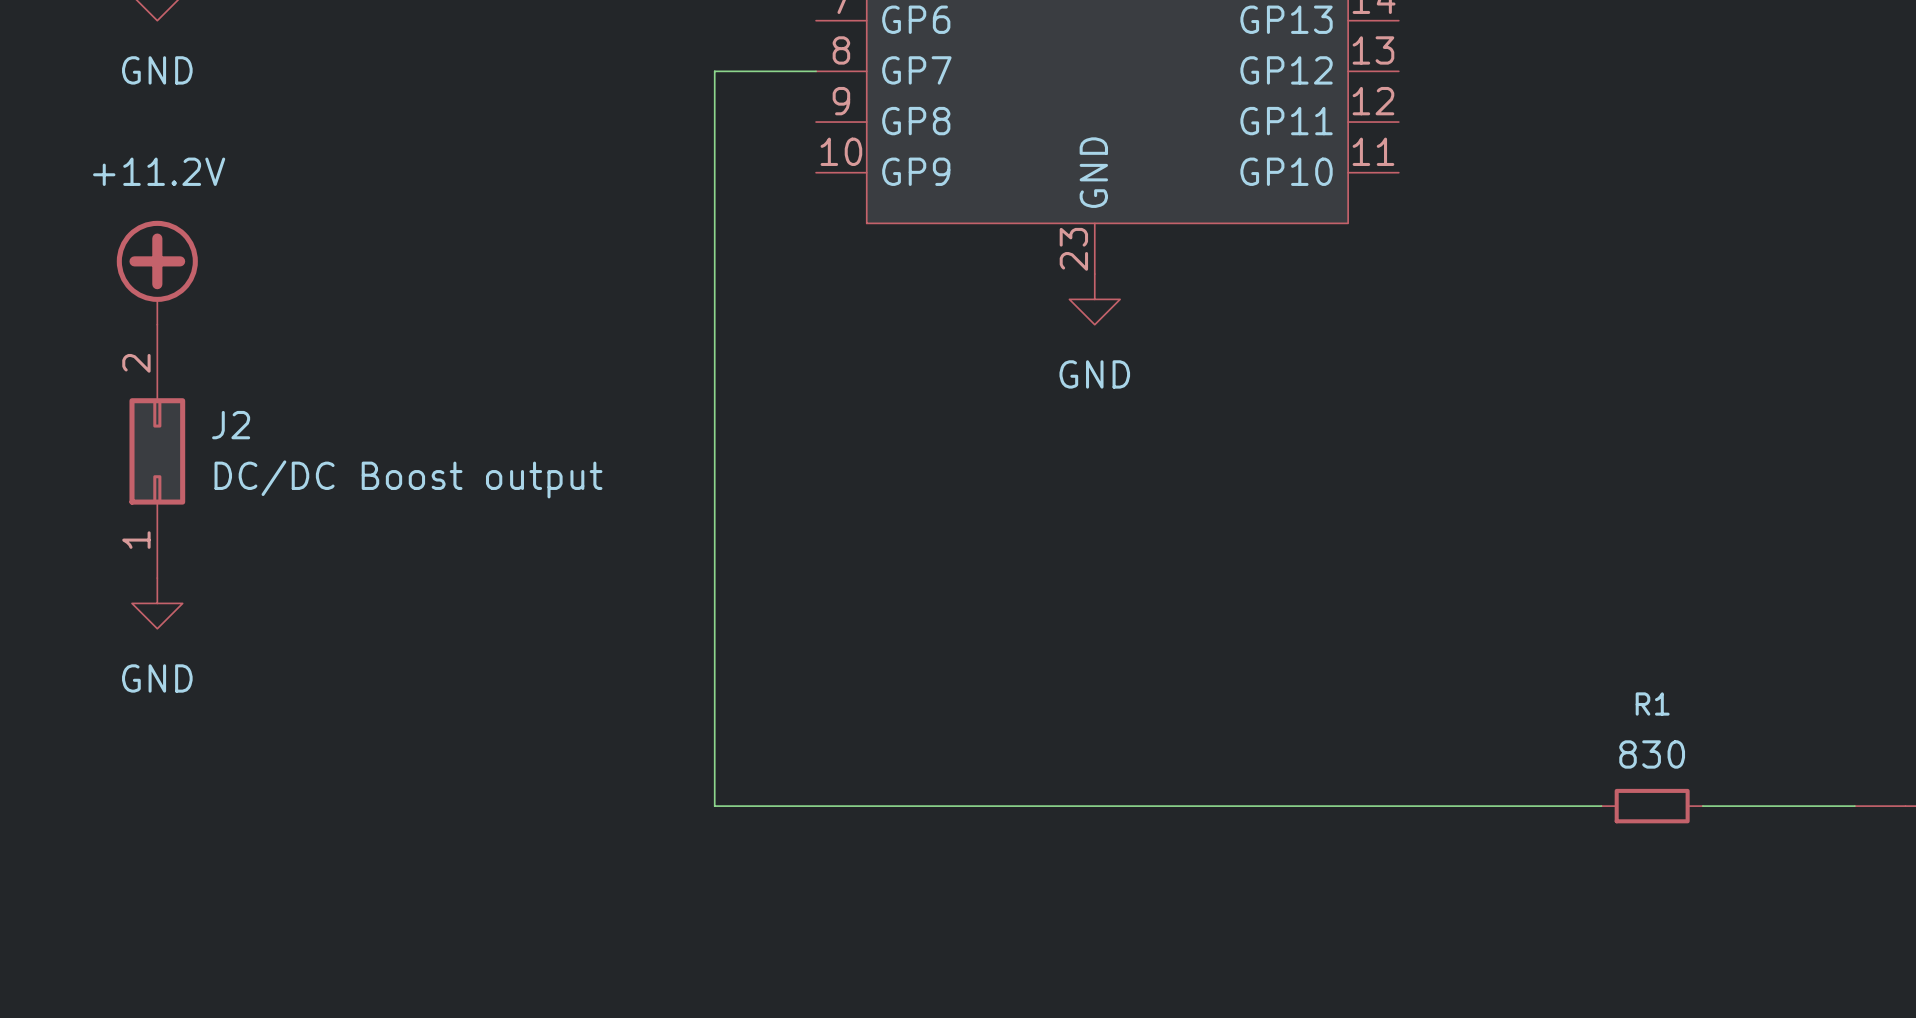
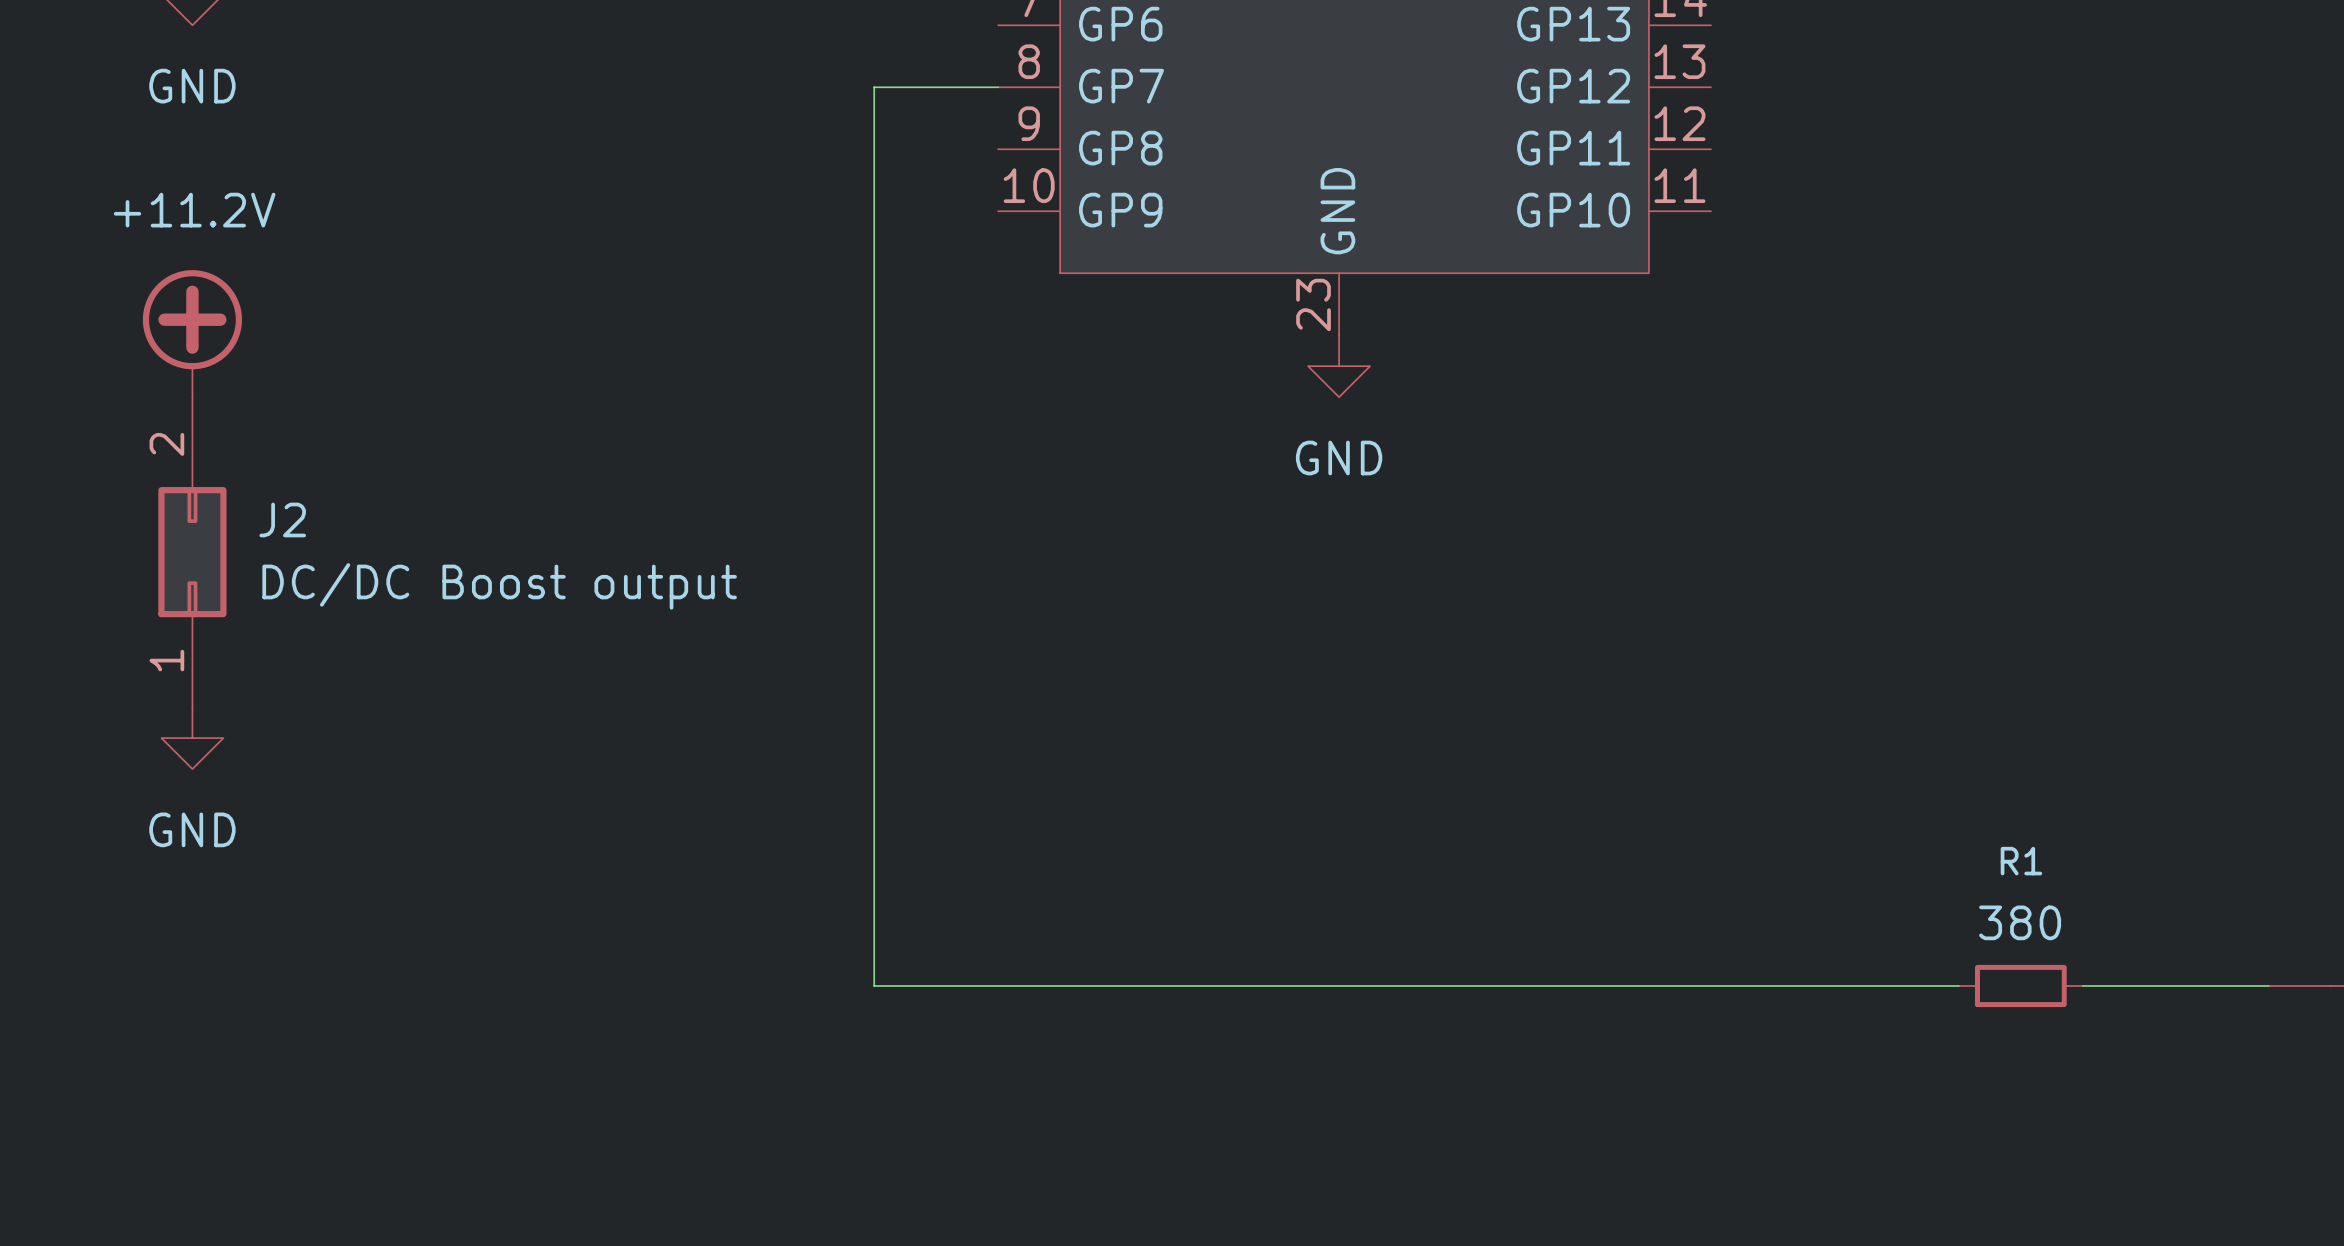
R1 value: 830 (1652, 754) -> 380 (2020, 922)

